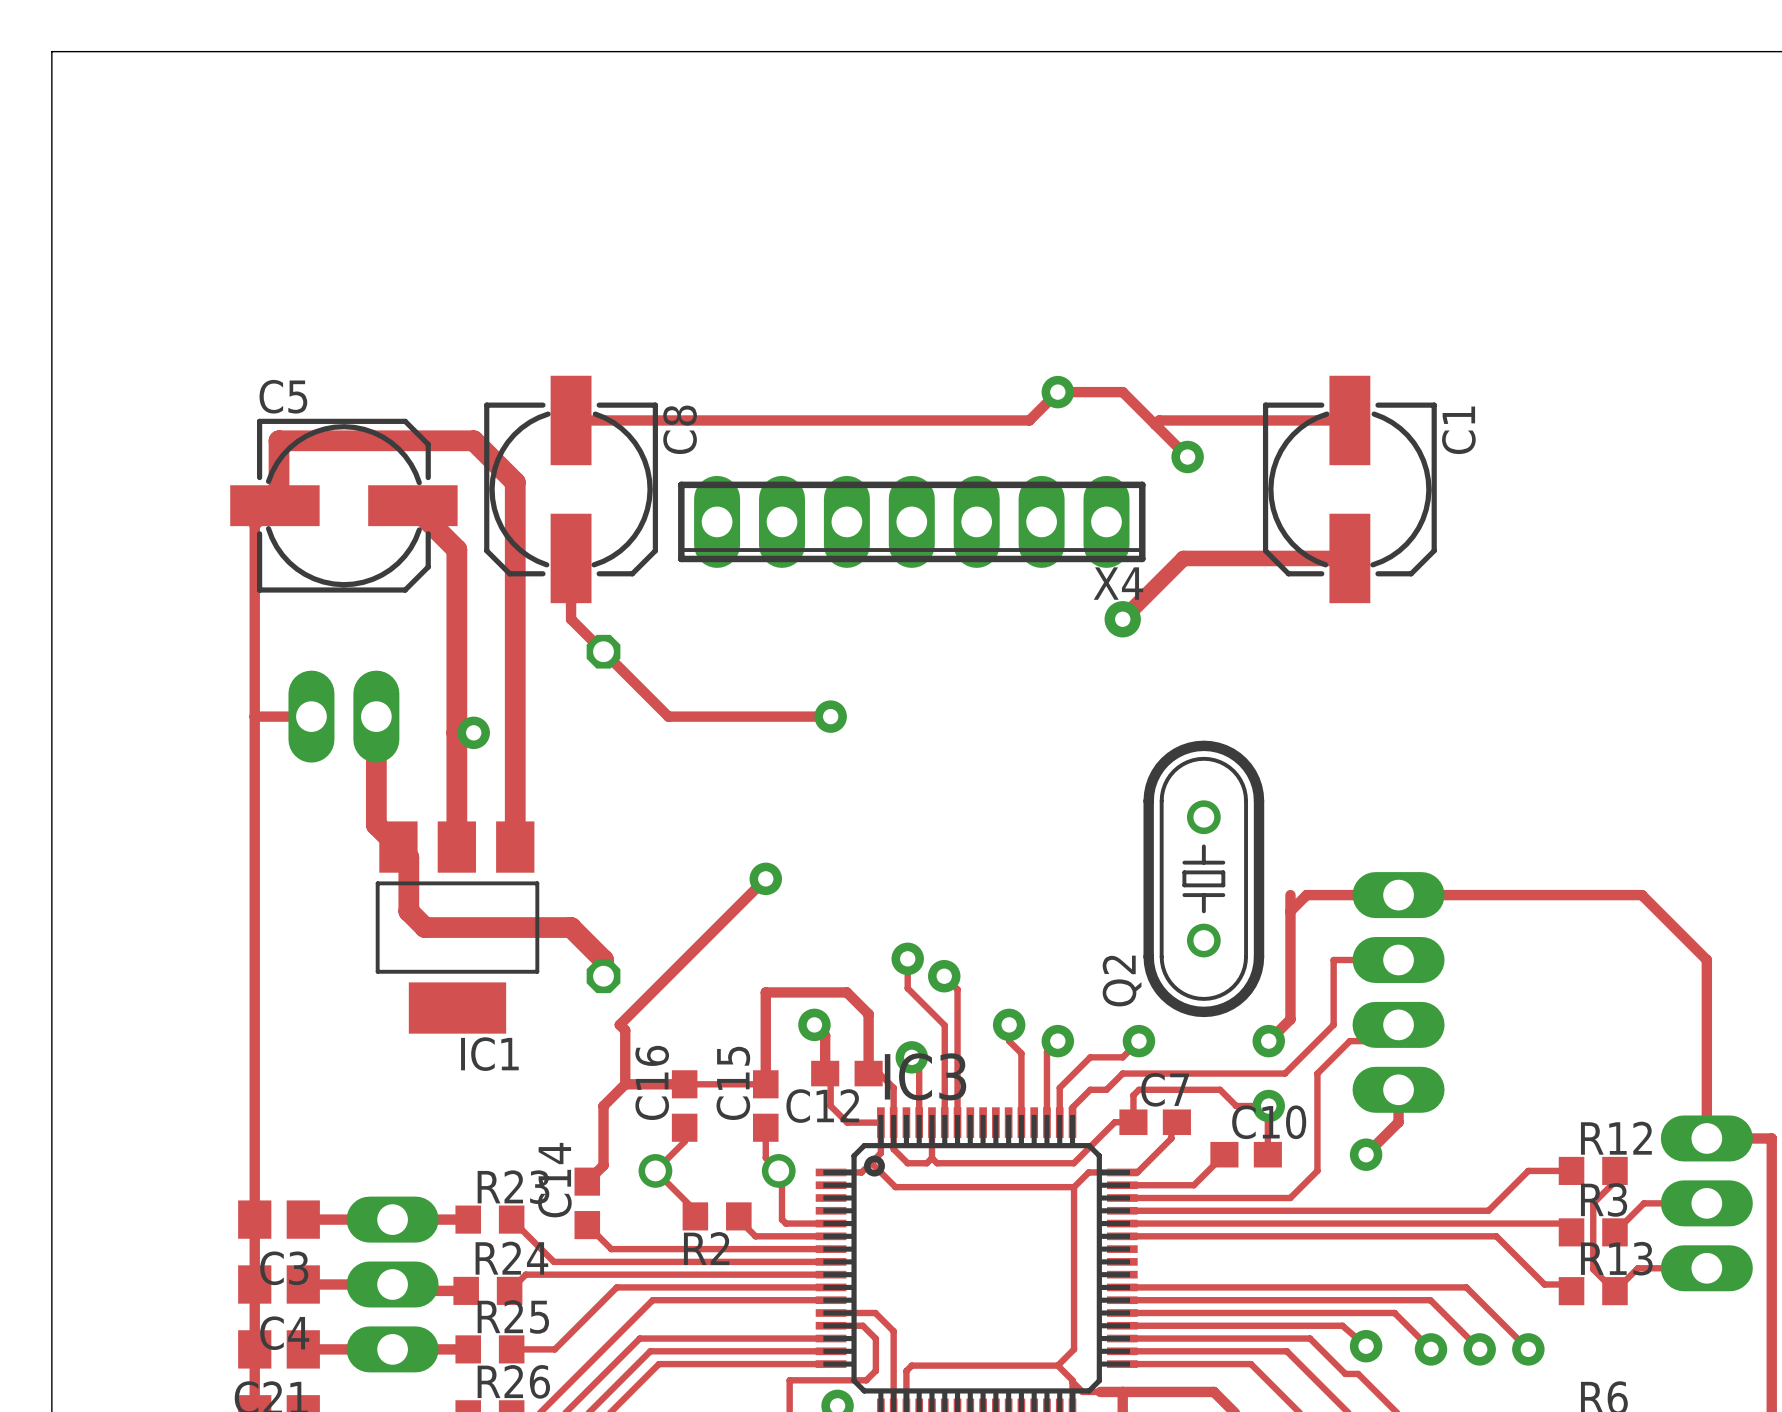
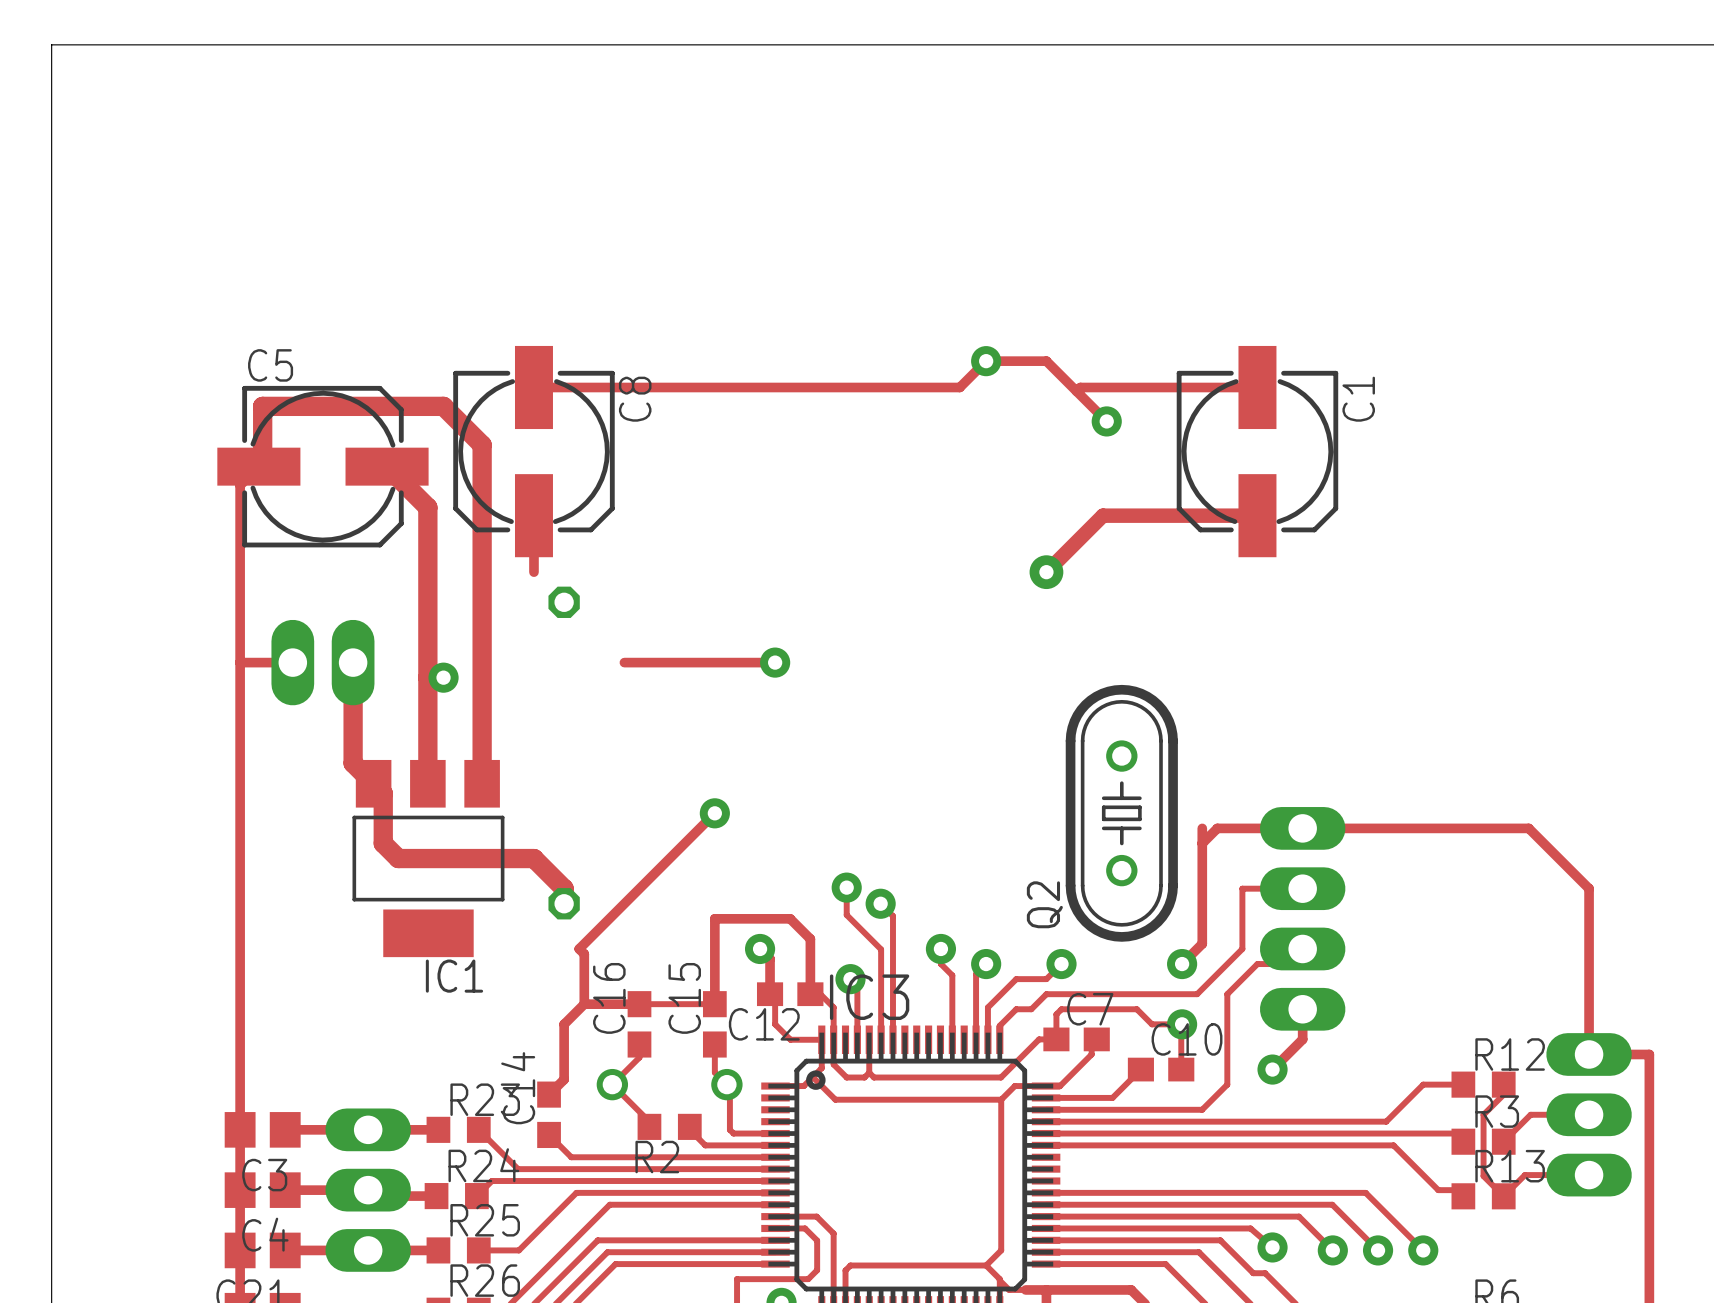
X4: (911, 521) -> none
track: (571, 619) (668, 716) -> none

